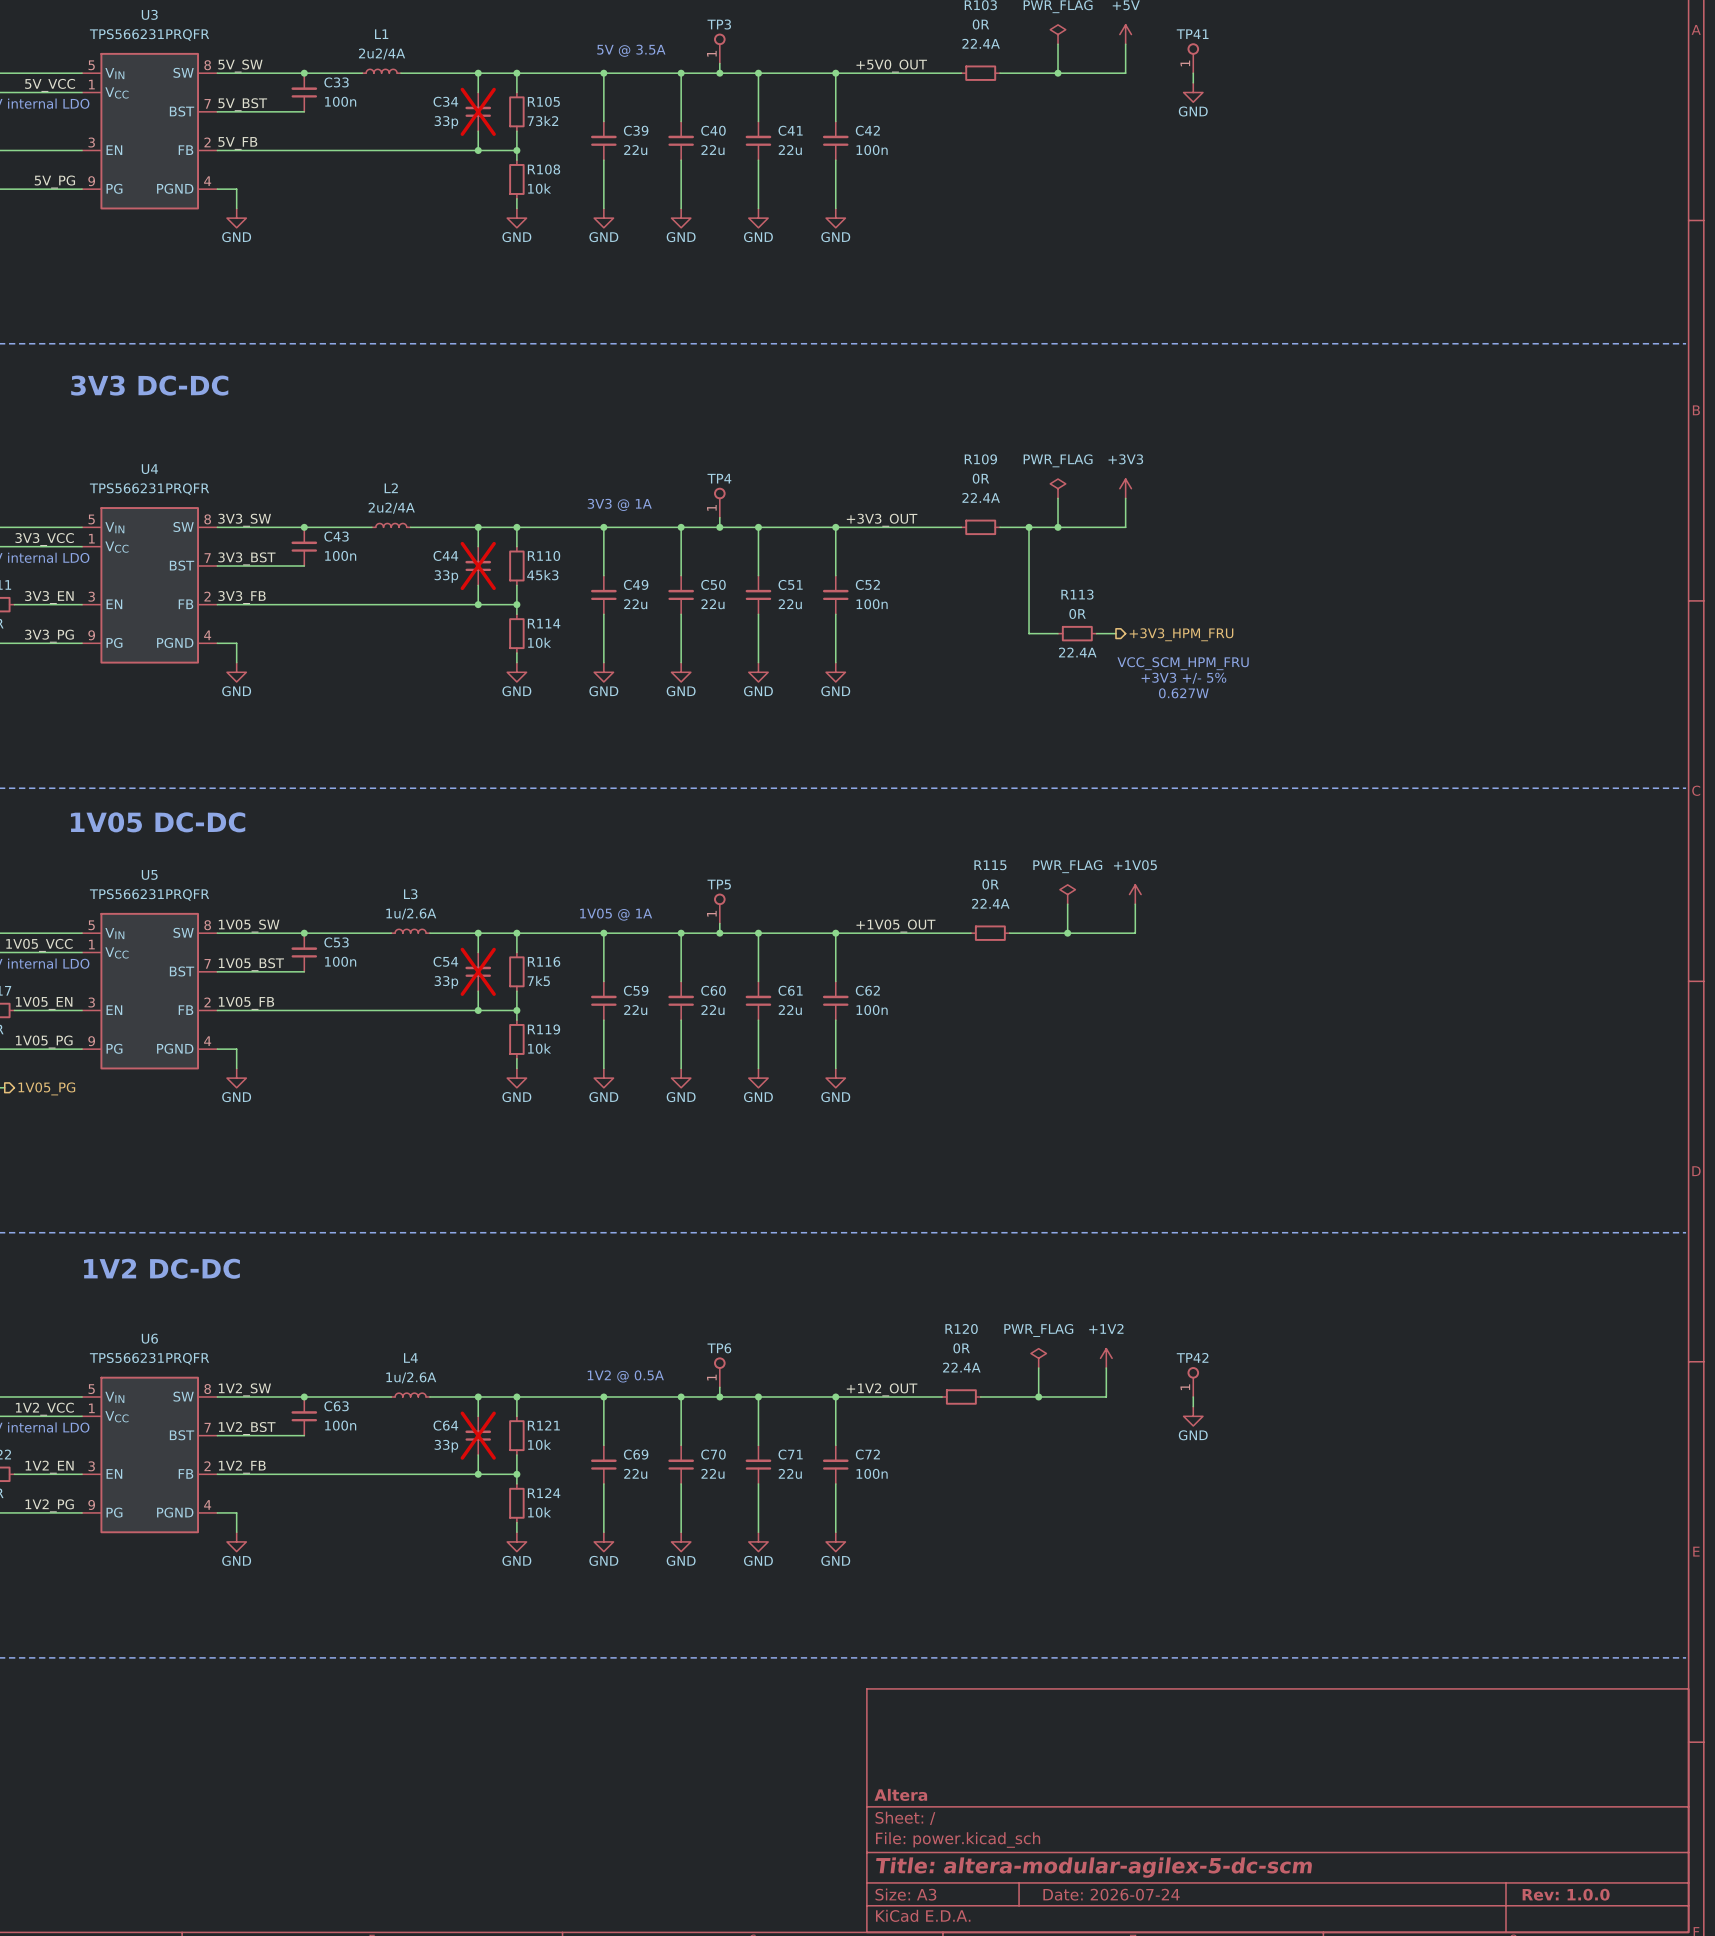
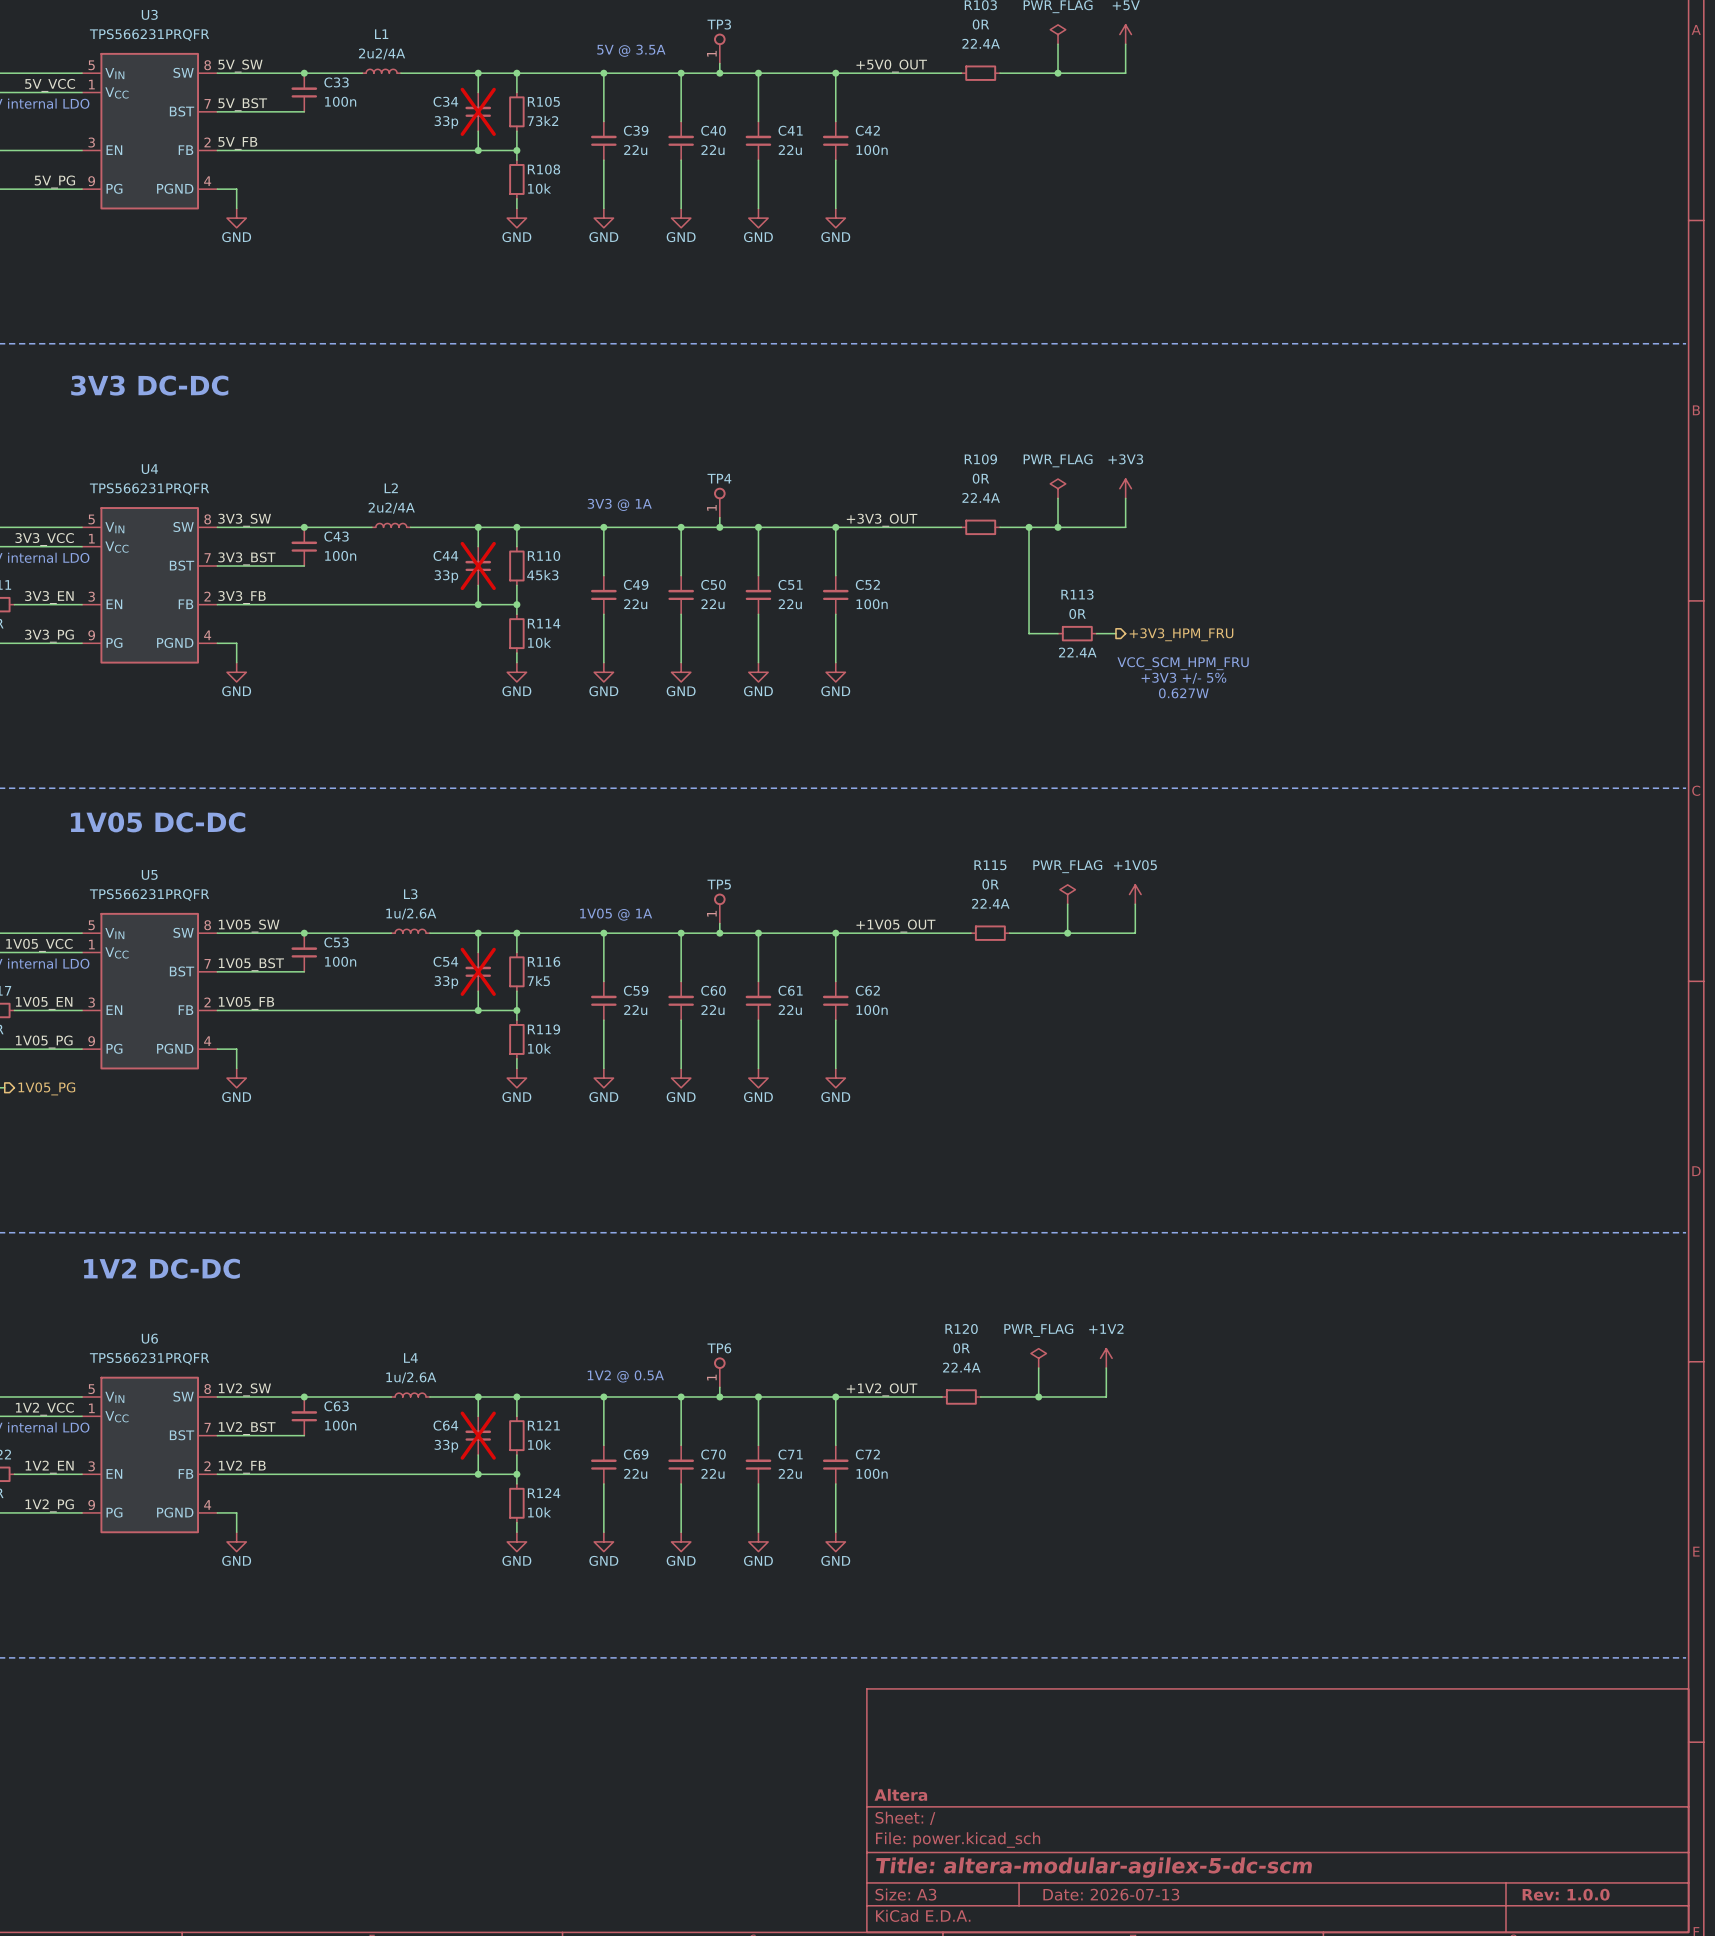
TP41: (1193, 58) -> none
wire: (1193, 73) (1193, 82) -> none
power symbol: GND (1193, 92) -> none
TP42: (1193, 1382) -> none
wire: (1193, 1396) (1193, 1406) -> none
power symbol: GND (1193, 1416) -> none
title block: Date: 2026-07-24 (1111, 1894) -> Date: 2026-07-13 (1111, 1894)

